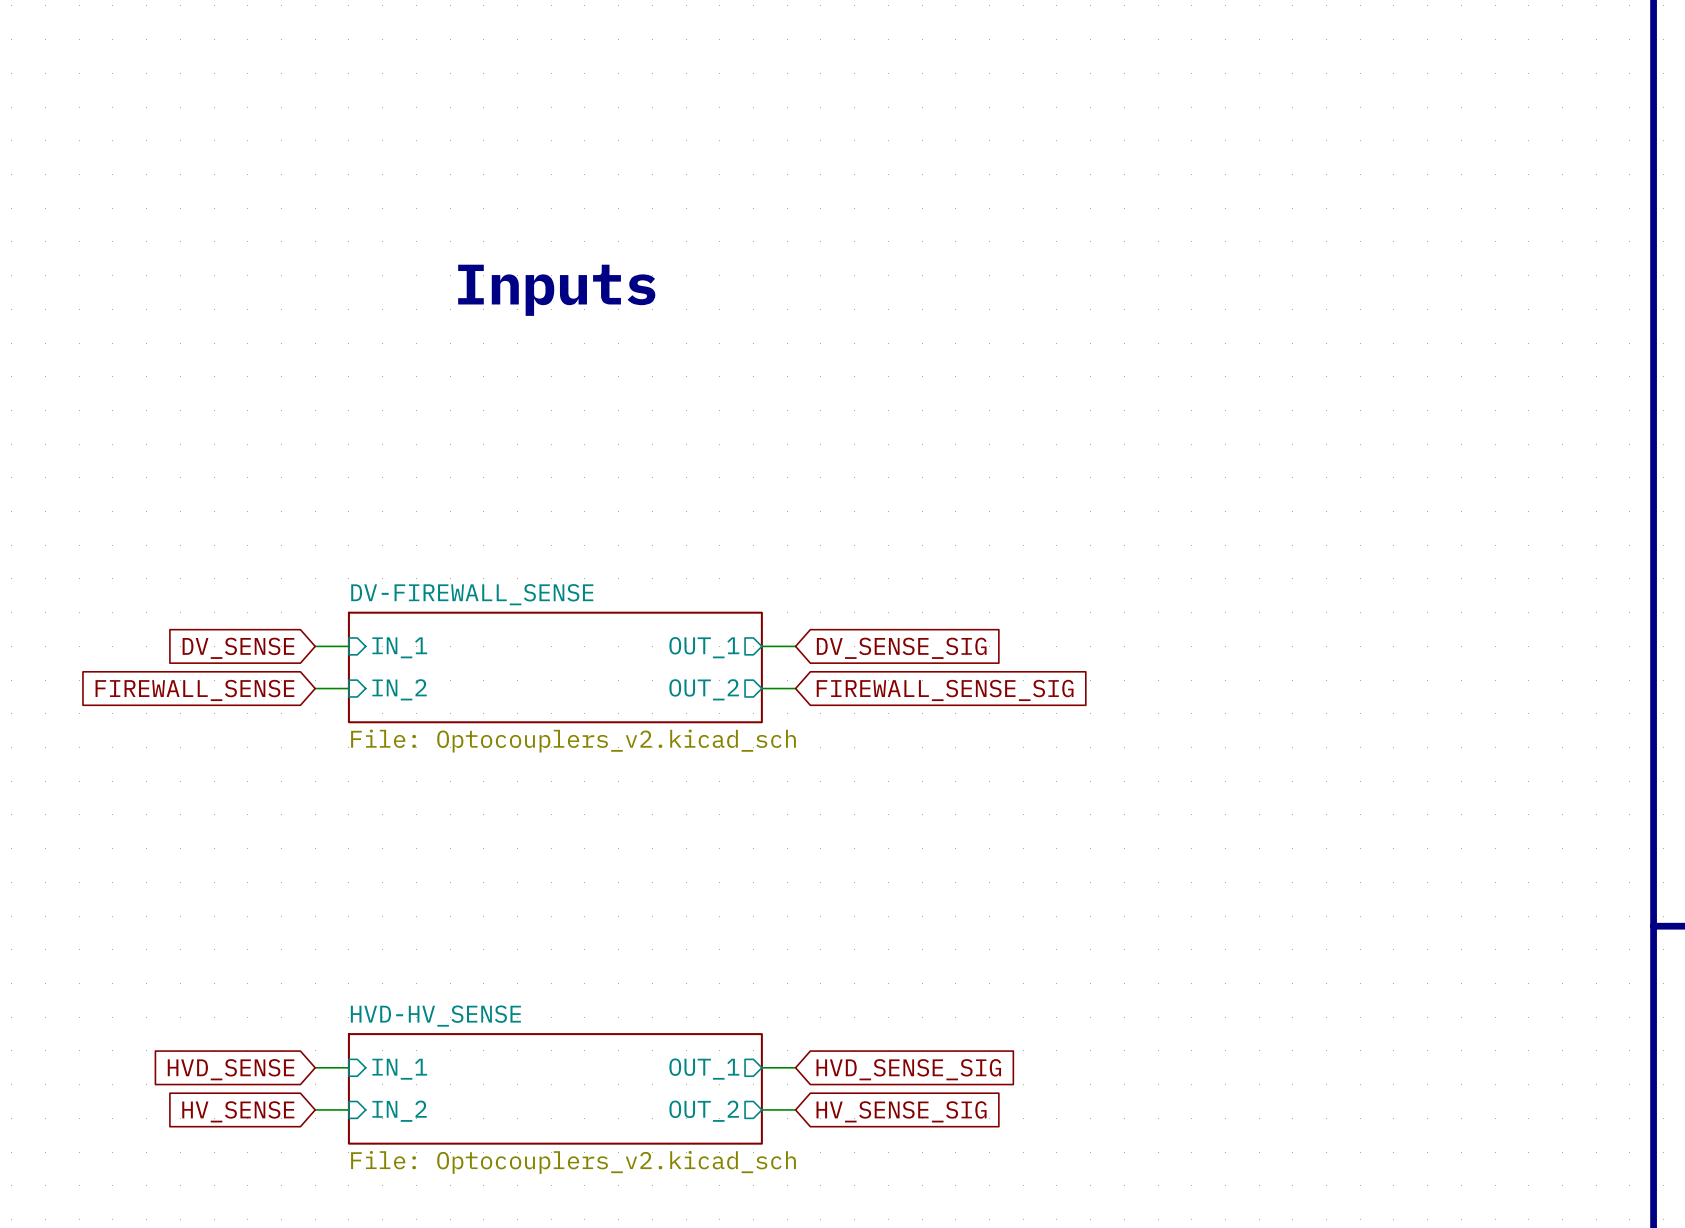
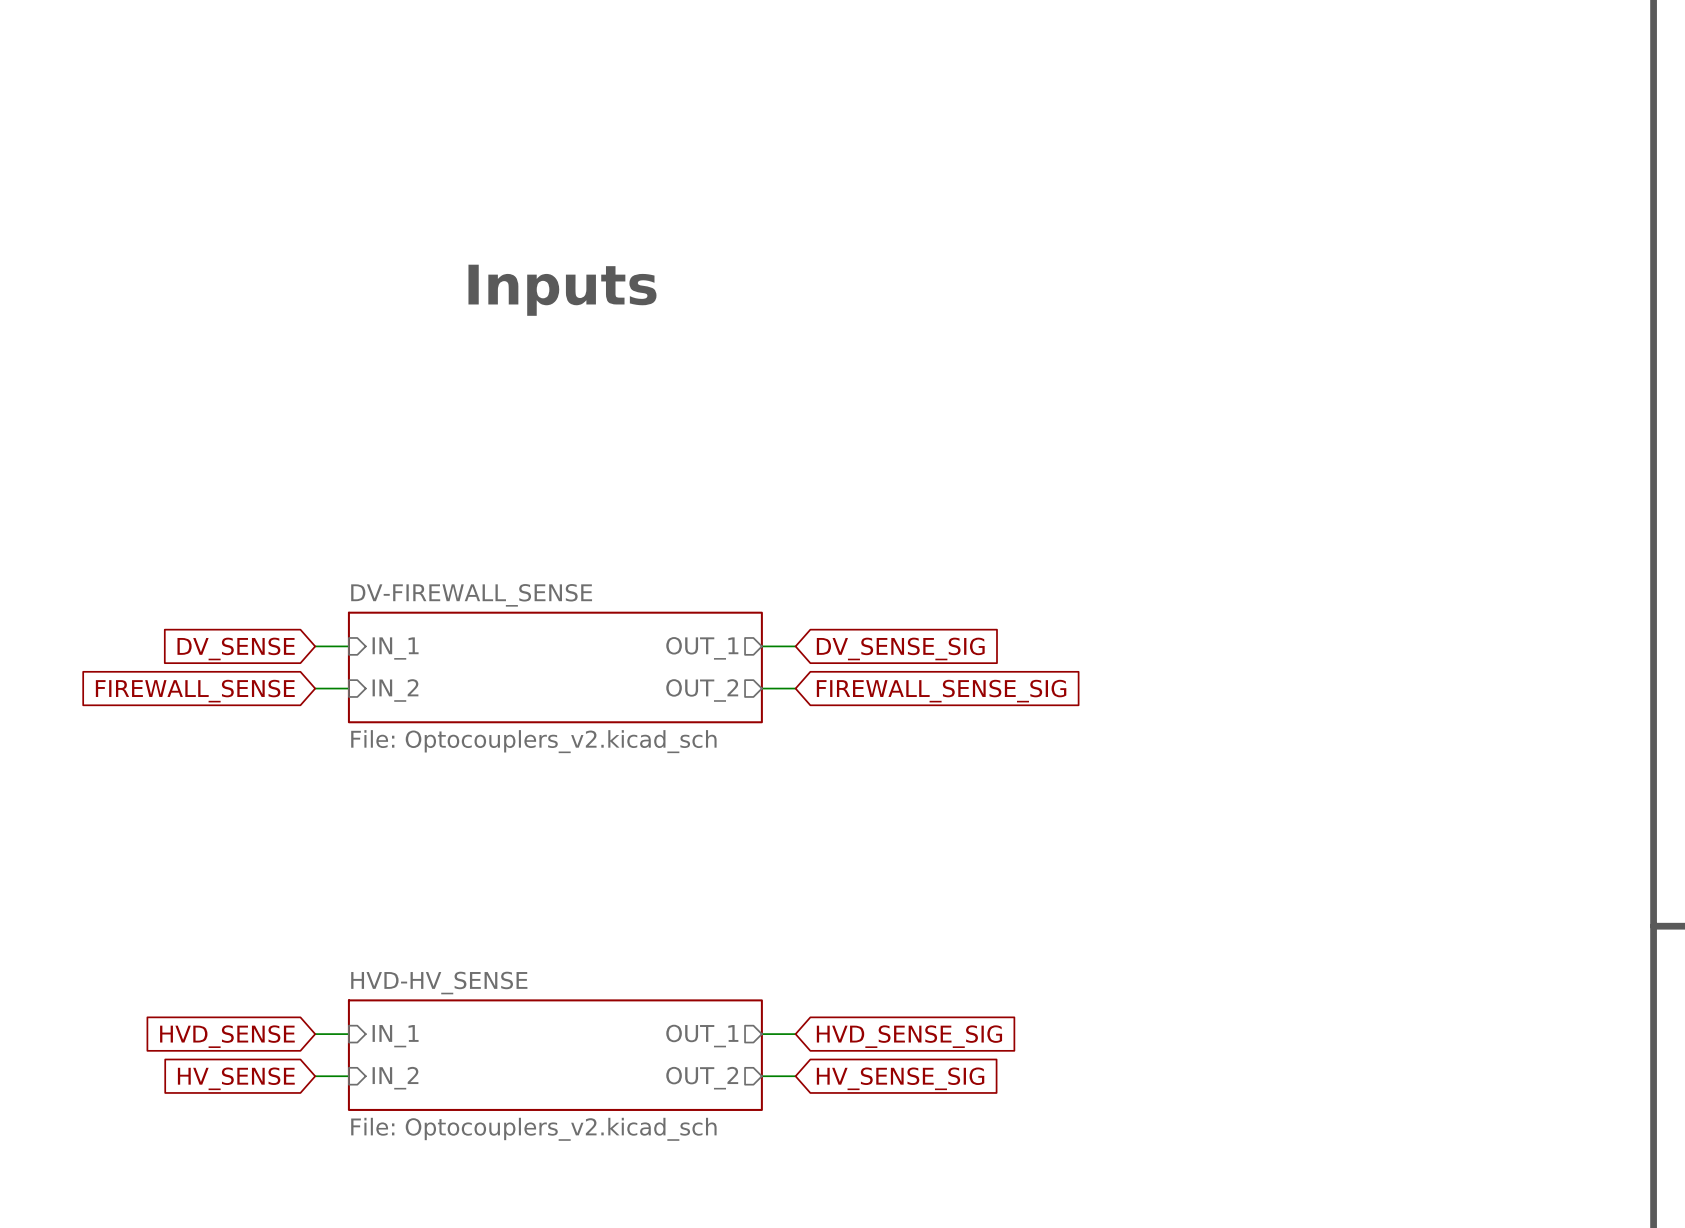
wire: (315, 1067) (348, 1067) -> (315, 1034) (348, 1034)
wire: (761, 1067) (795, 1067) -> (761, 1034) (795, 1034)
global label position: HVD_SENSE (231, 1069) -> HVD_SENSE (227, 1036)
sheet pin position: IN_1 (399, 1069) -> IN_1 (395, 1036)
sheet pin position: OUT_1 (704, 1069) -> OUT_1 (702, 1036)
global label position: HVD_SENSE_SIG (908, 1069) -> HVD_SENSE_SIG (909, 1036)
sheet HVD-HV_SENSE position: (555, 1088) -> (555, 1055)
wire: (315, 1109) (348, 1109) -> (315, 1076) (348, 1076)
wire: (761, 1109) (795, 1109) -> (761, 1076) (795, 1076)
global label position: HV_SENSE (238, 1111) -> HV_SENSE (236, 1078)
sheet pin position: IN_2 (399, 1111) -> IN_2 (395, 1078)
sheet pin position: OUT_2 (704, 1111) -> OUT_2 (702, 1078)
global label position: HV_SENSE_SIG (901, 1111) -> HV_SENSE_SIG (900, 1078)

